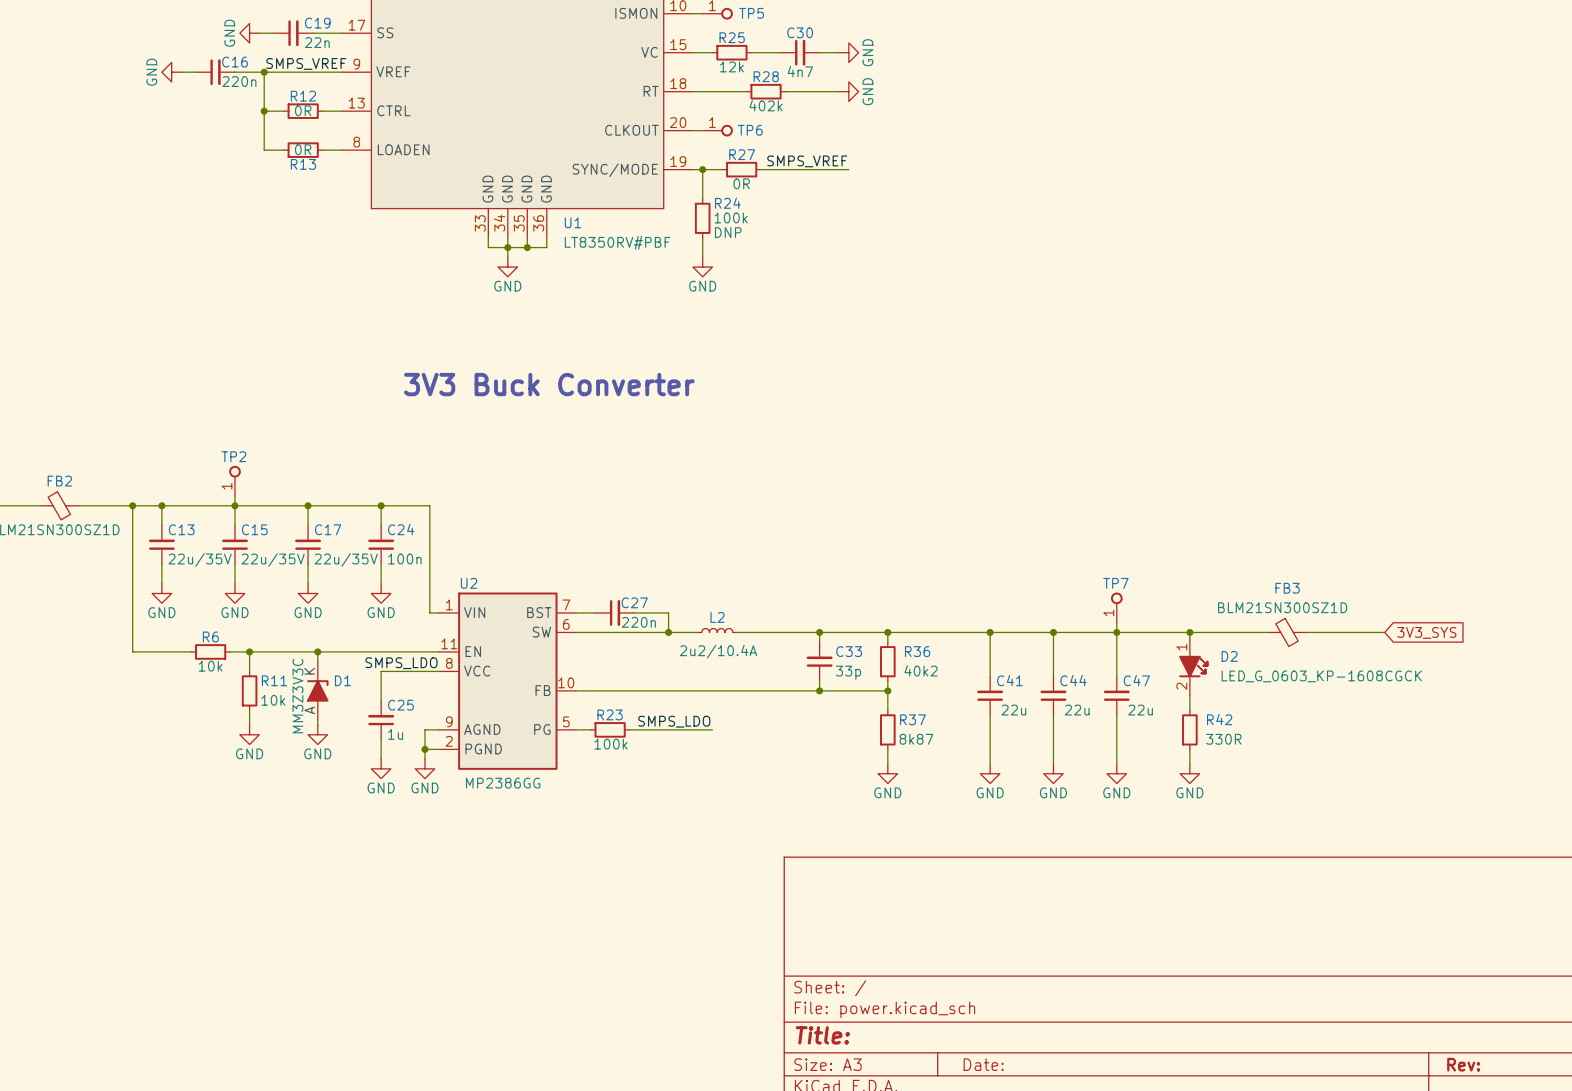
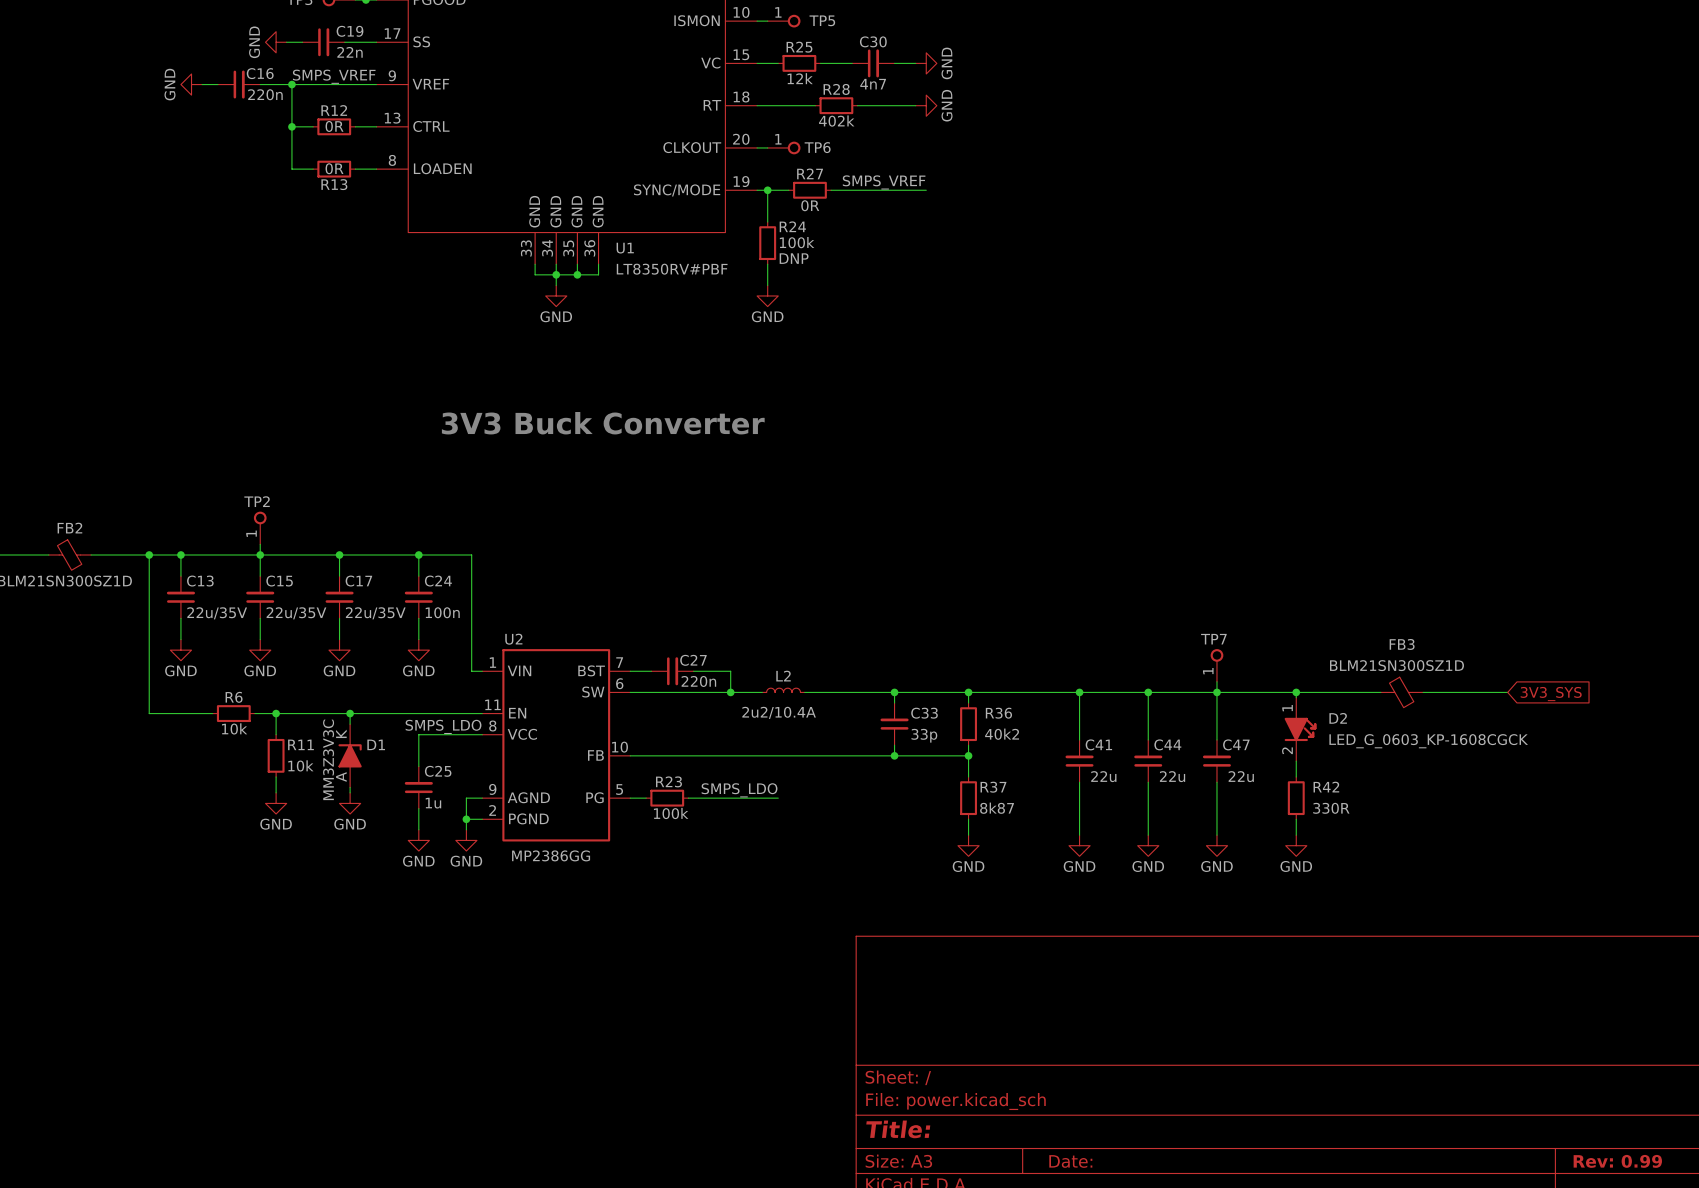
title block: Rev: (1463, 1064) -> Rev: 0.99 (1617, 1161)

